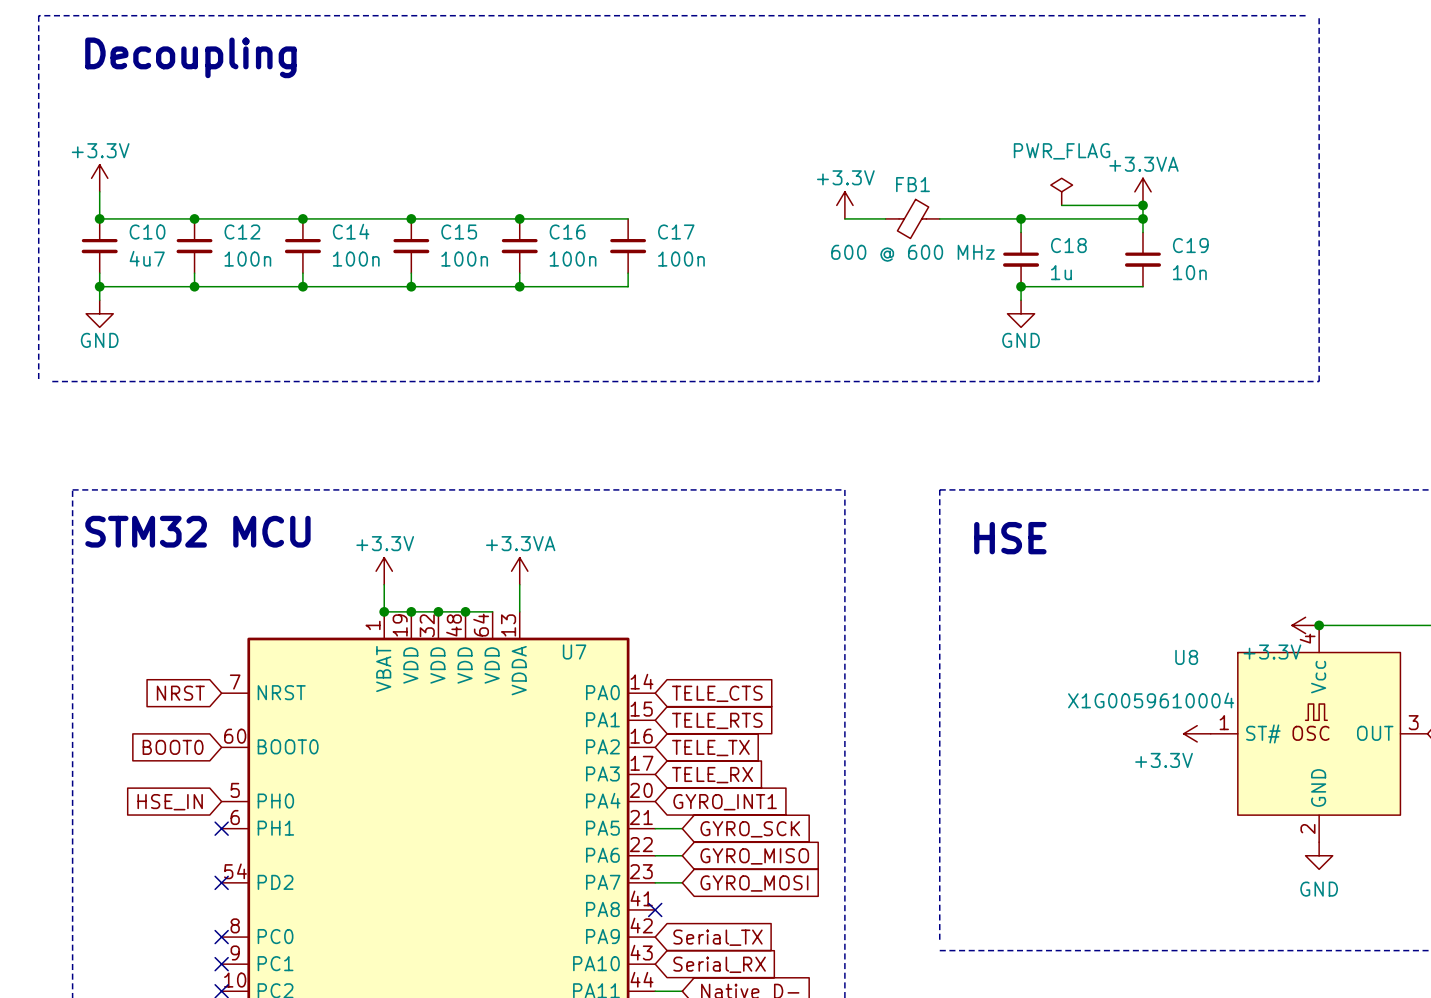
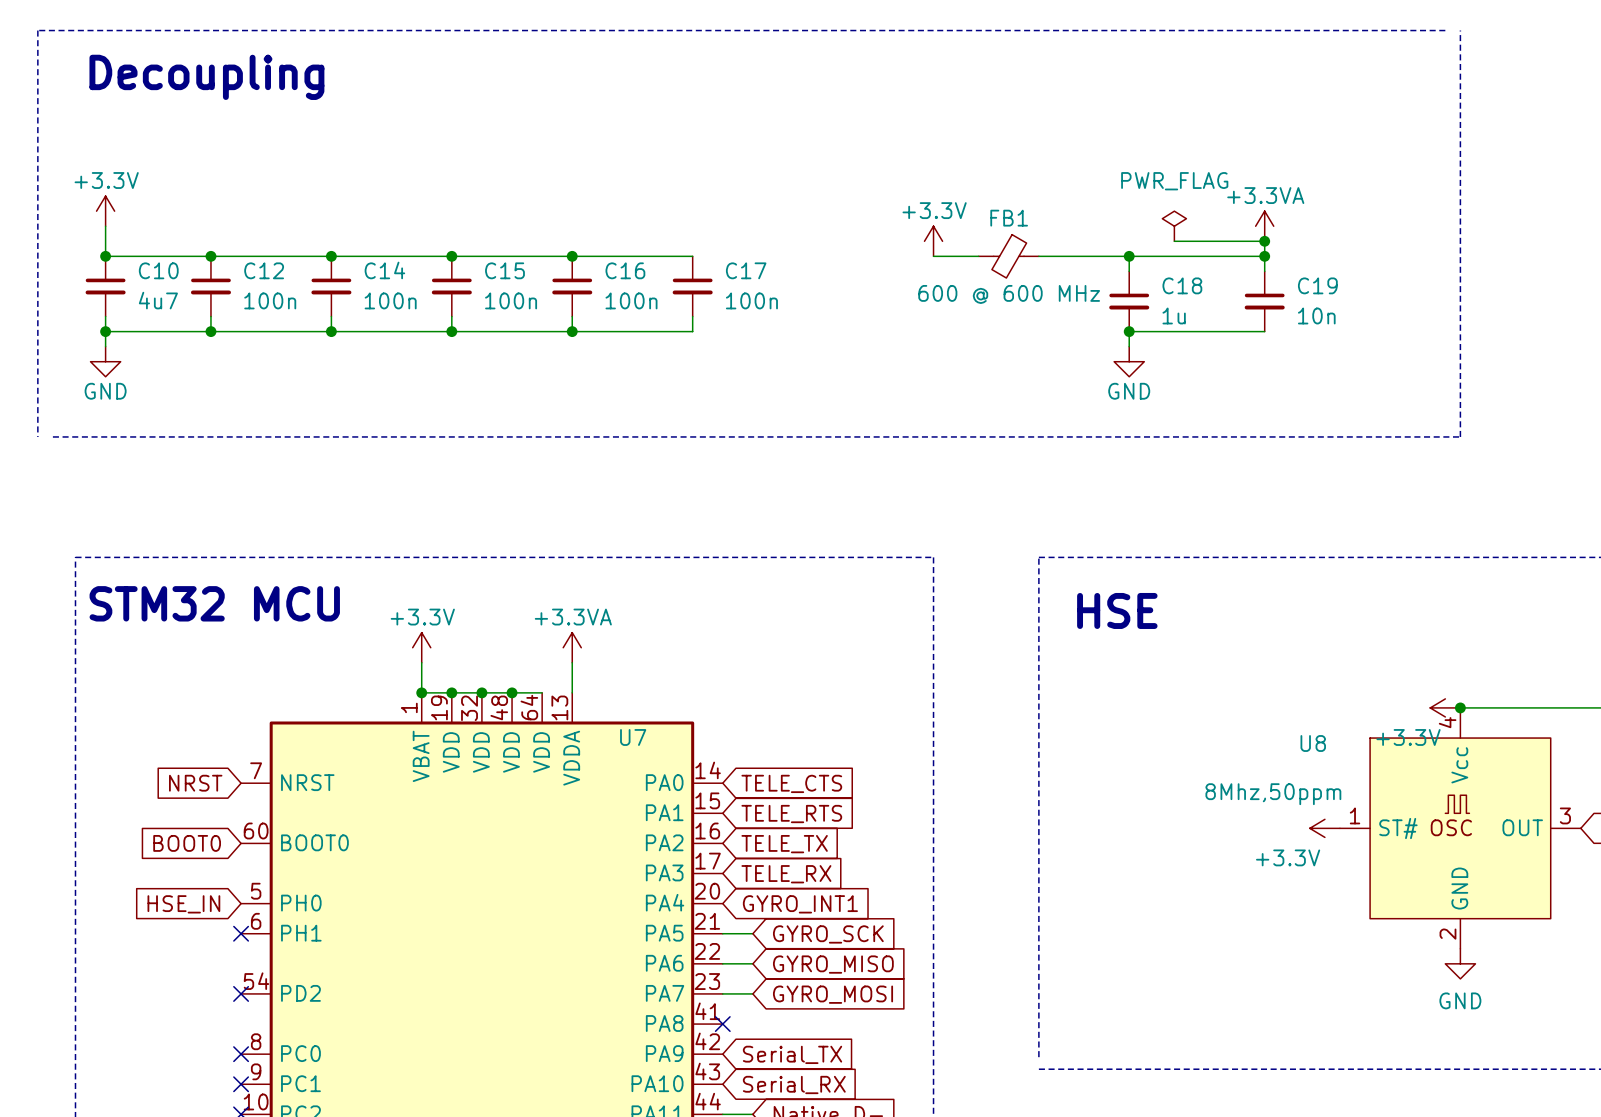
U8 value: X1G0059610004 (1151, 700) -> 8Mhz,50ppm (1273, 794)

